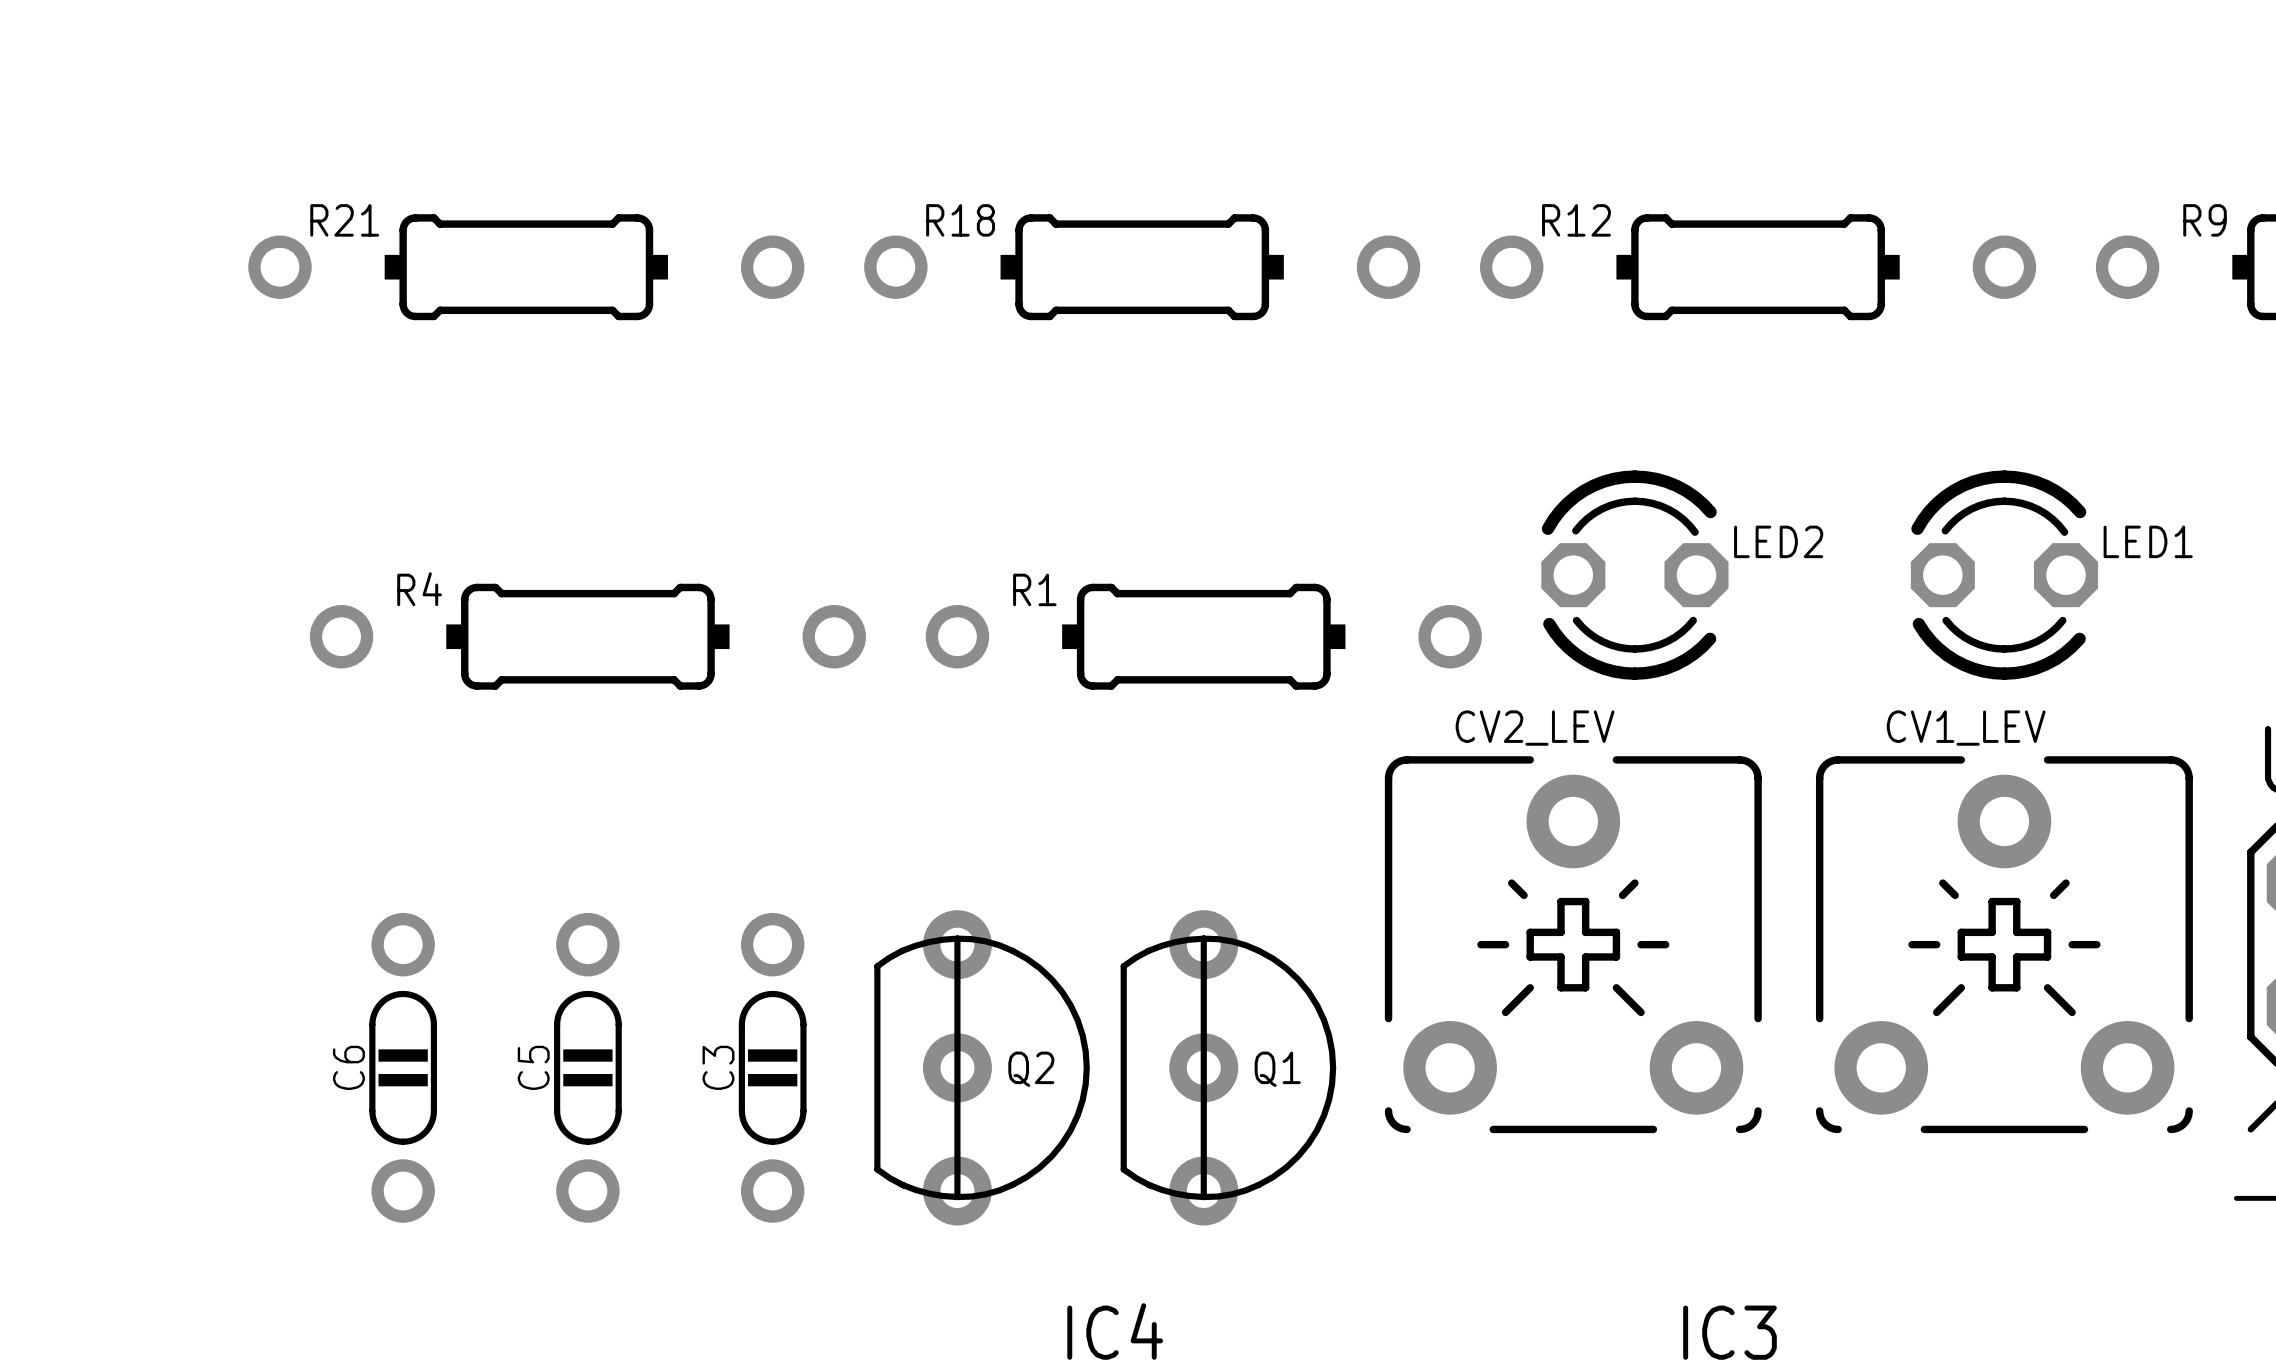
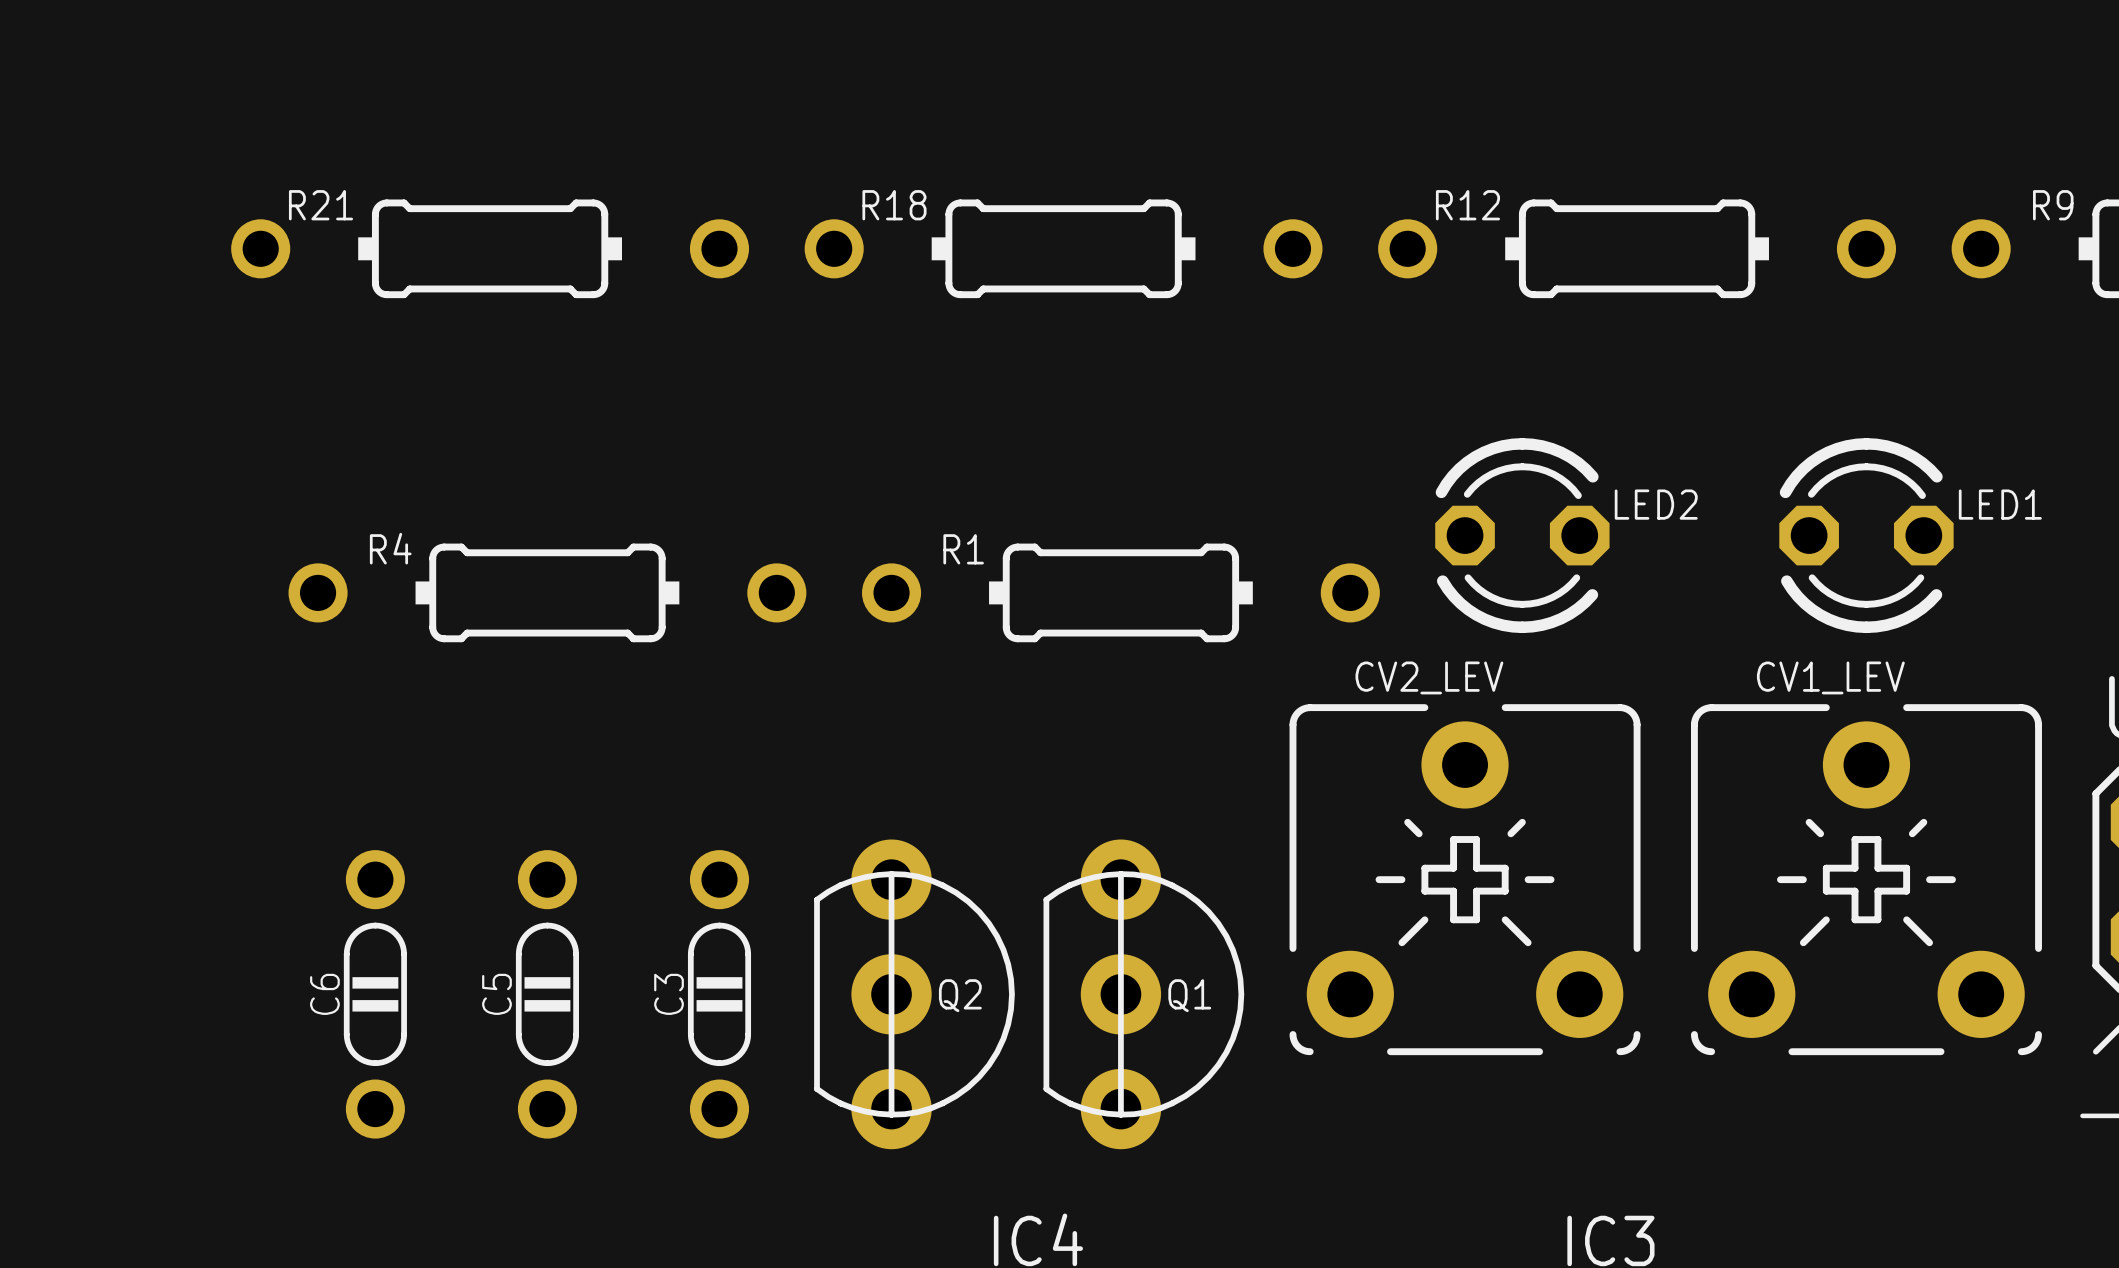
Q2 footprint: [874, 910, 1090, 1226] -> [814, 839, 1015, 1150]
Q1 footprint: [1120, 910, 1337, 1226] -> [1043, 839, 1245, 1150]

